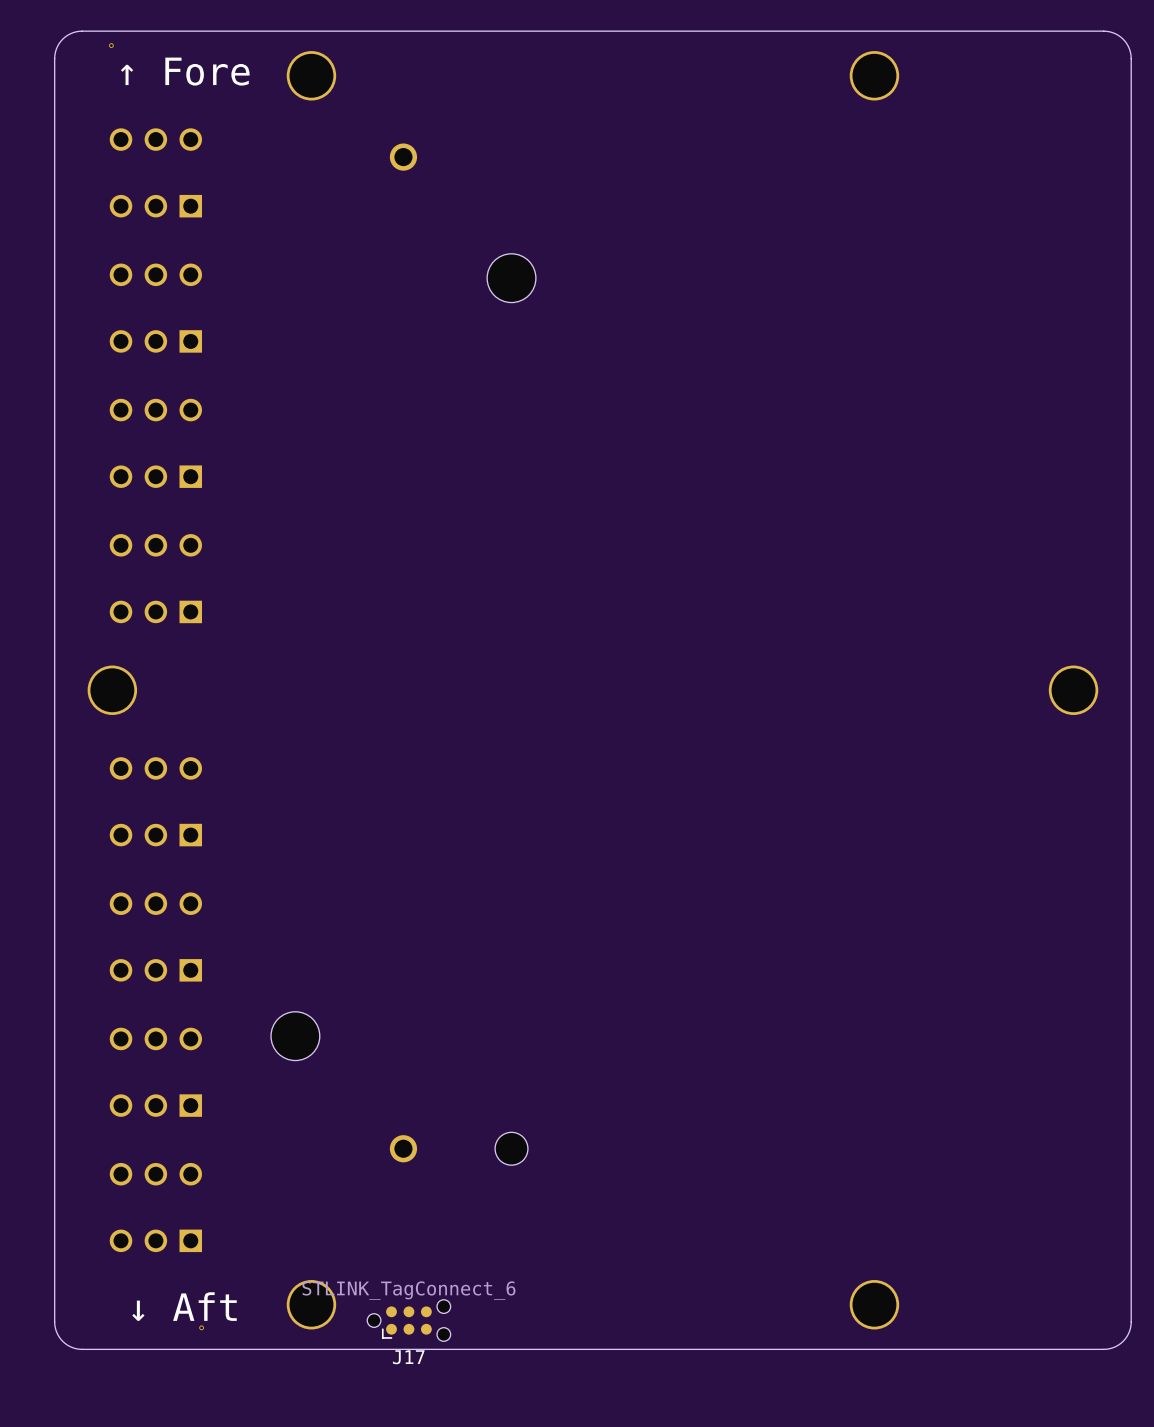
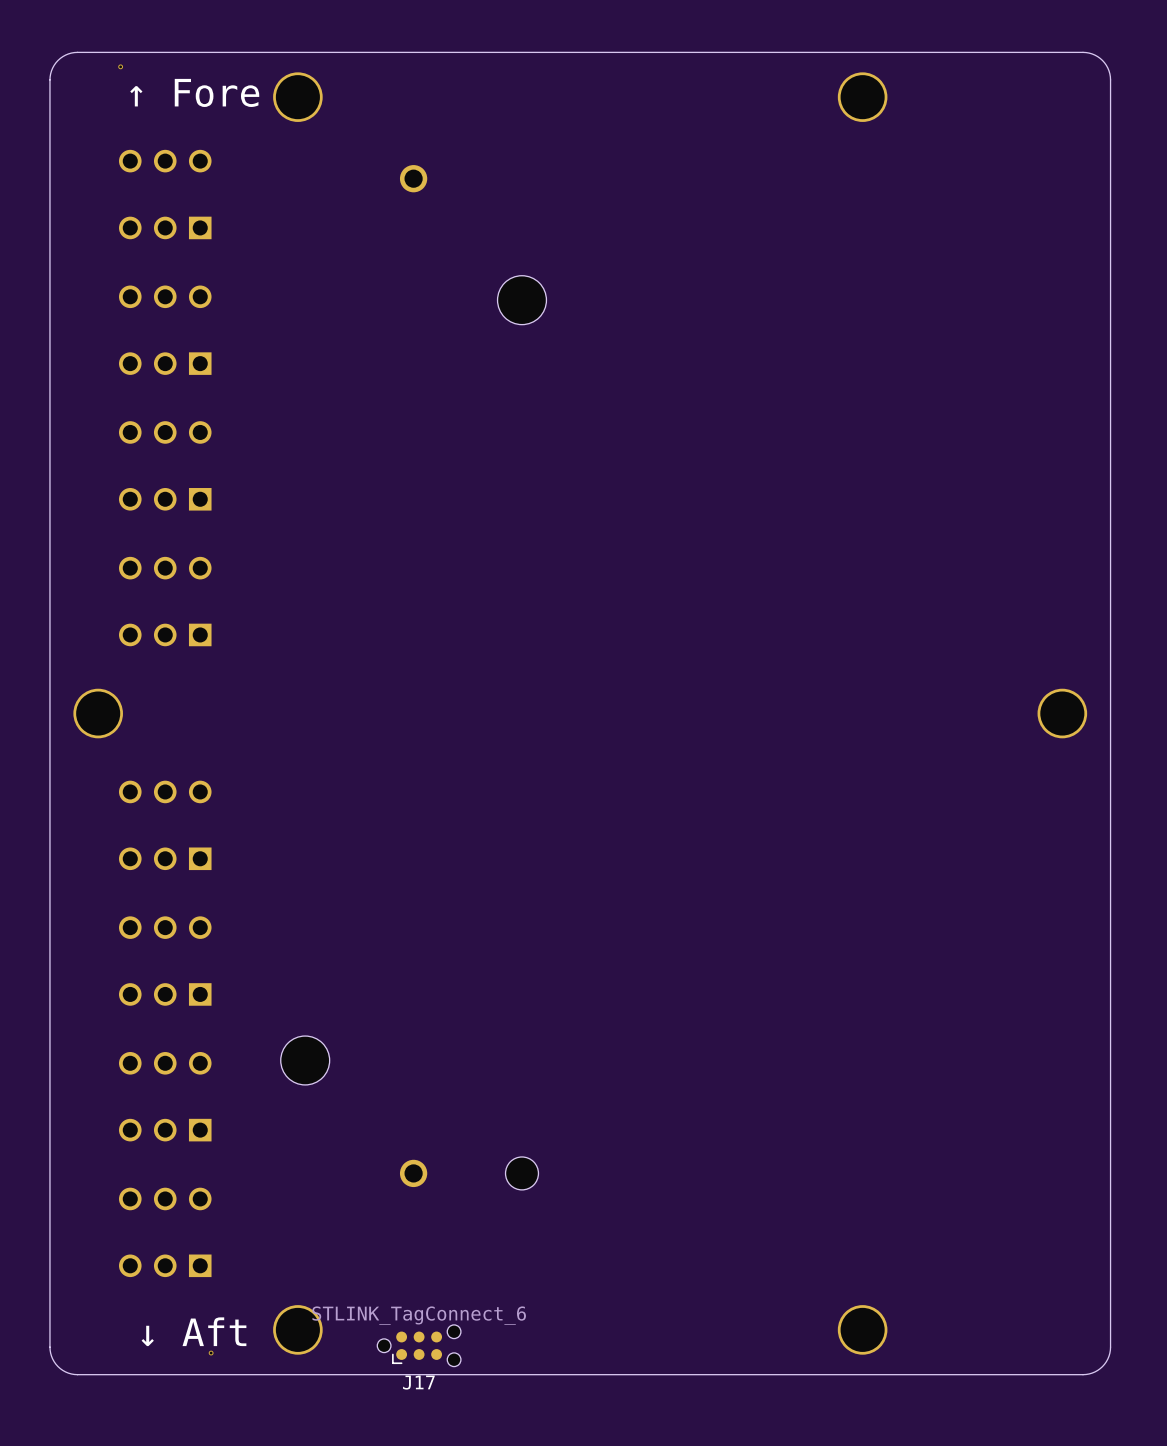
part: none -> (580, 713)
part: (592, 690) -> none

